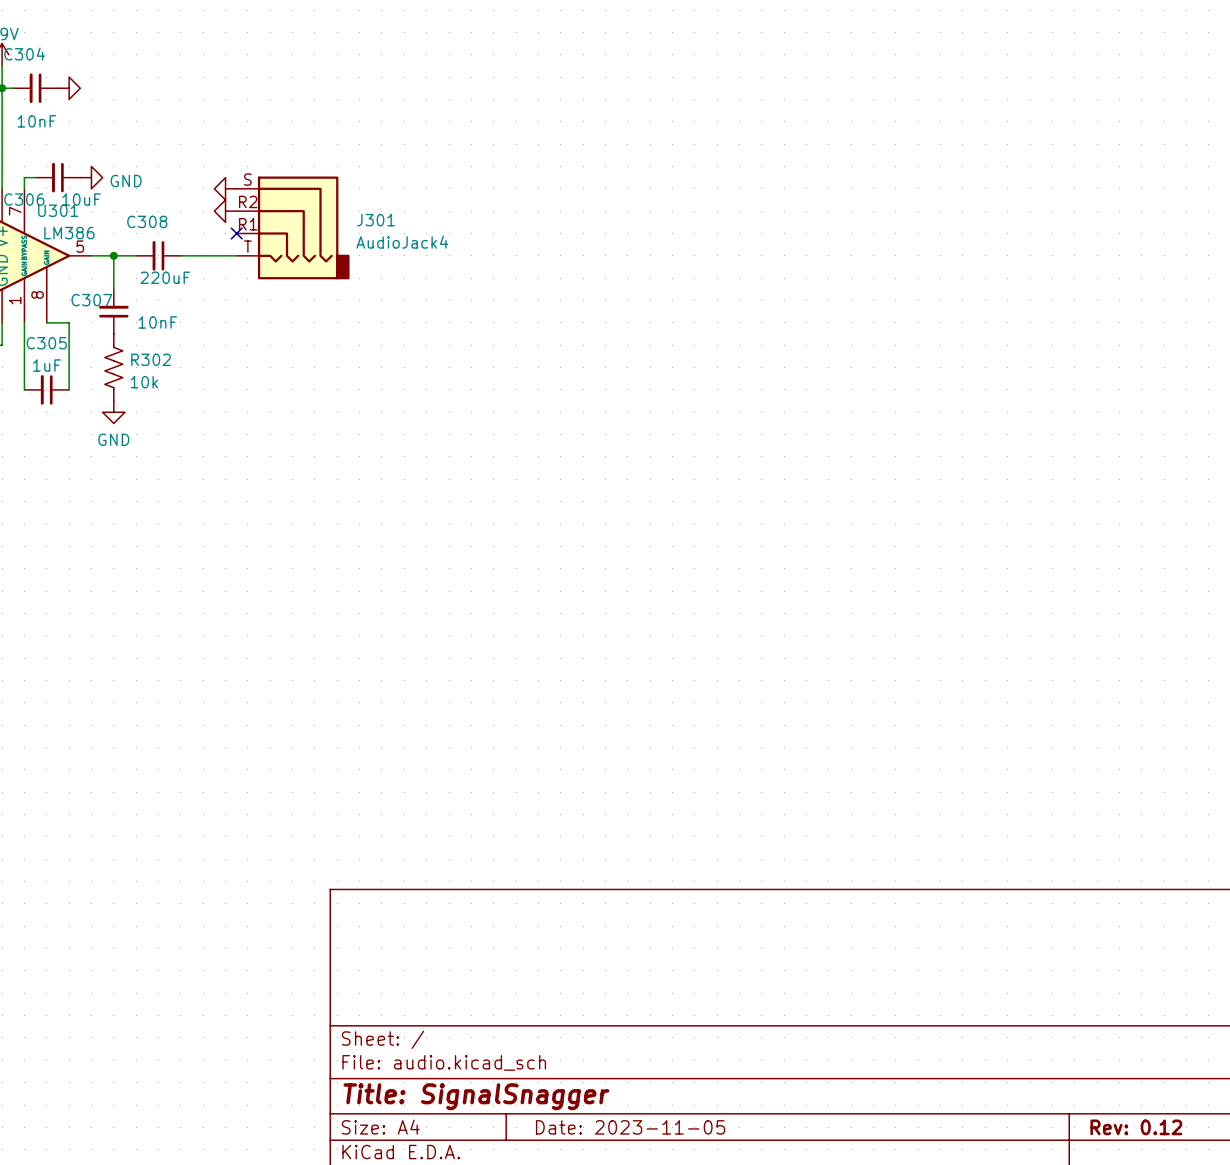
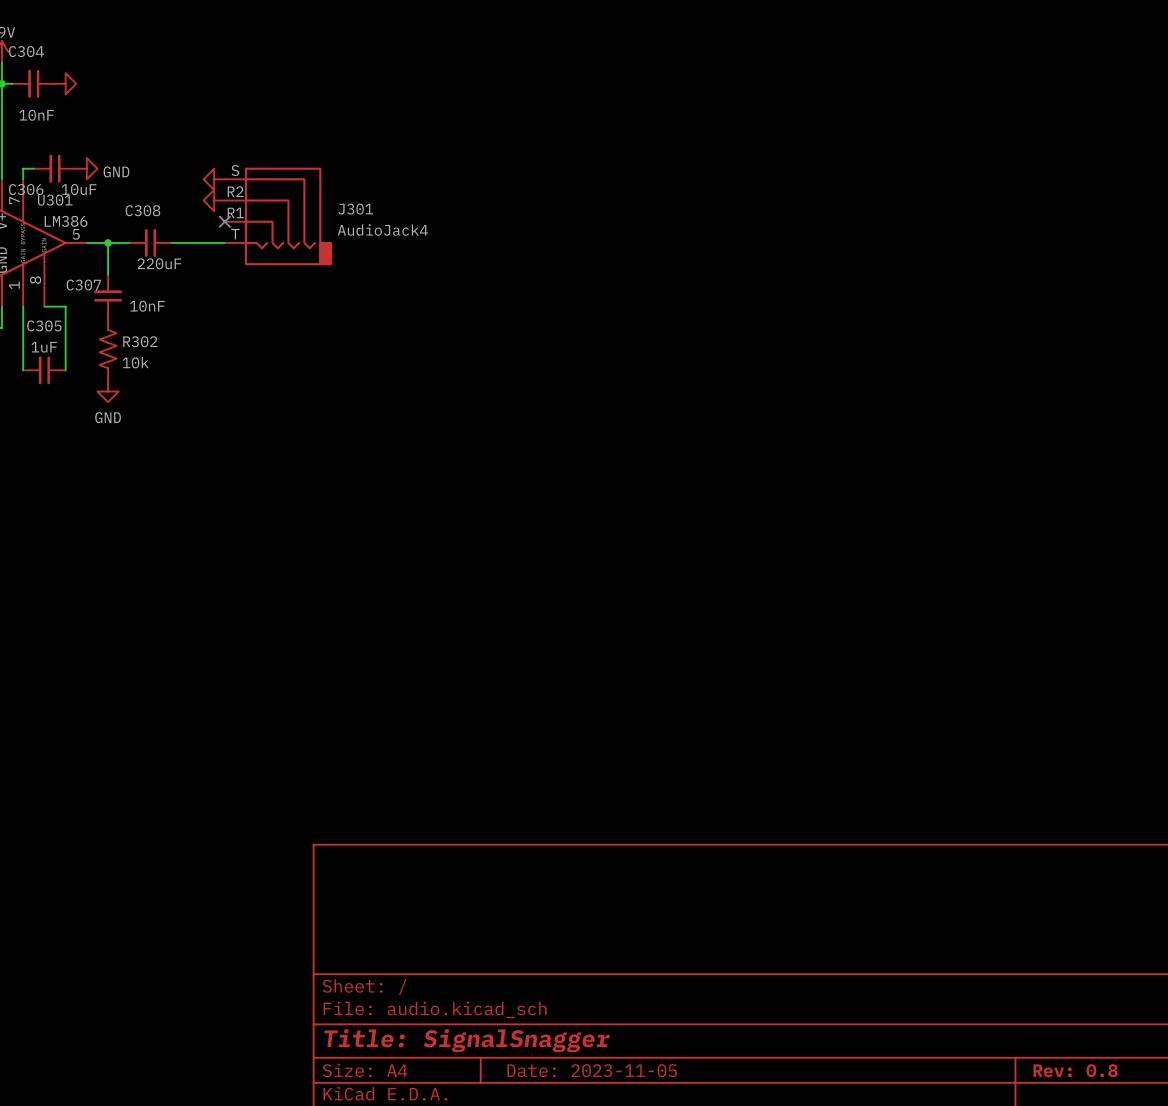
title block: Rev: 0.12 (1136, 1127) -> Rev: 0.8 (1075, 1070)

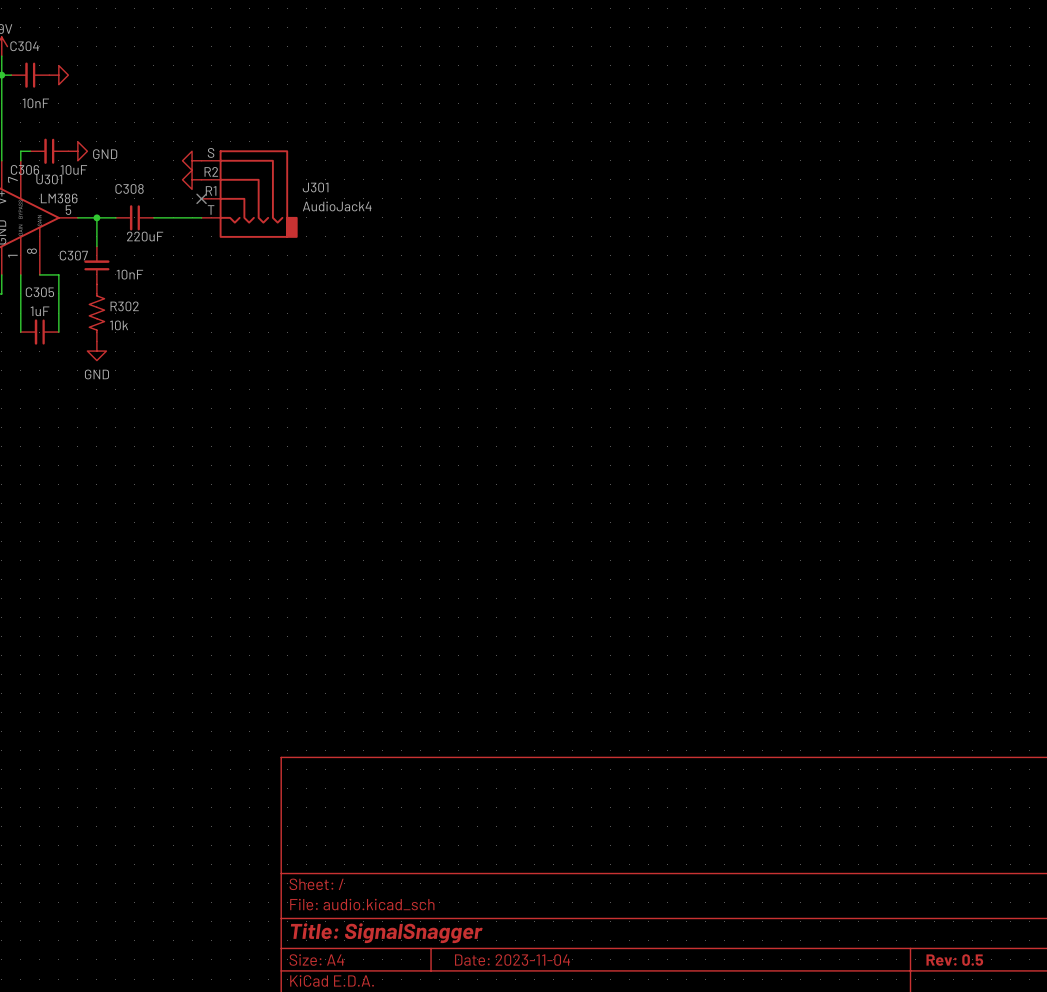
title block: Date: 2023-11-05 (592, 1070) -> Date: 2023-11-04 (512, 960)
title block: Rev: 0.8 (1075, 1070) -> Rev: 0.5 (954, 960)

